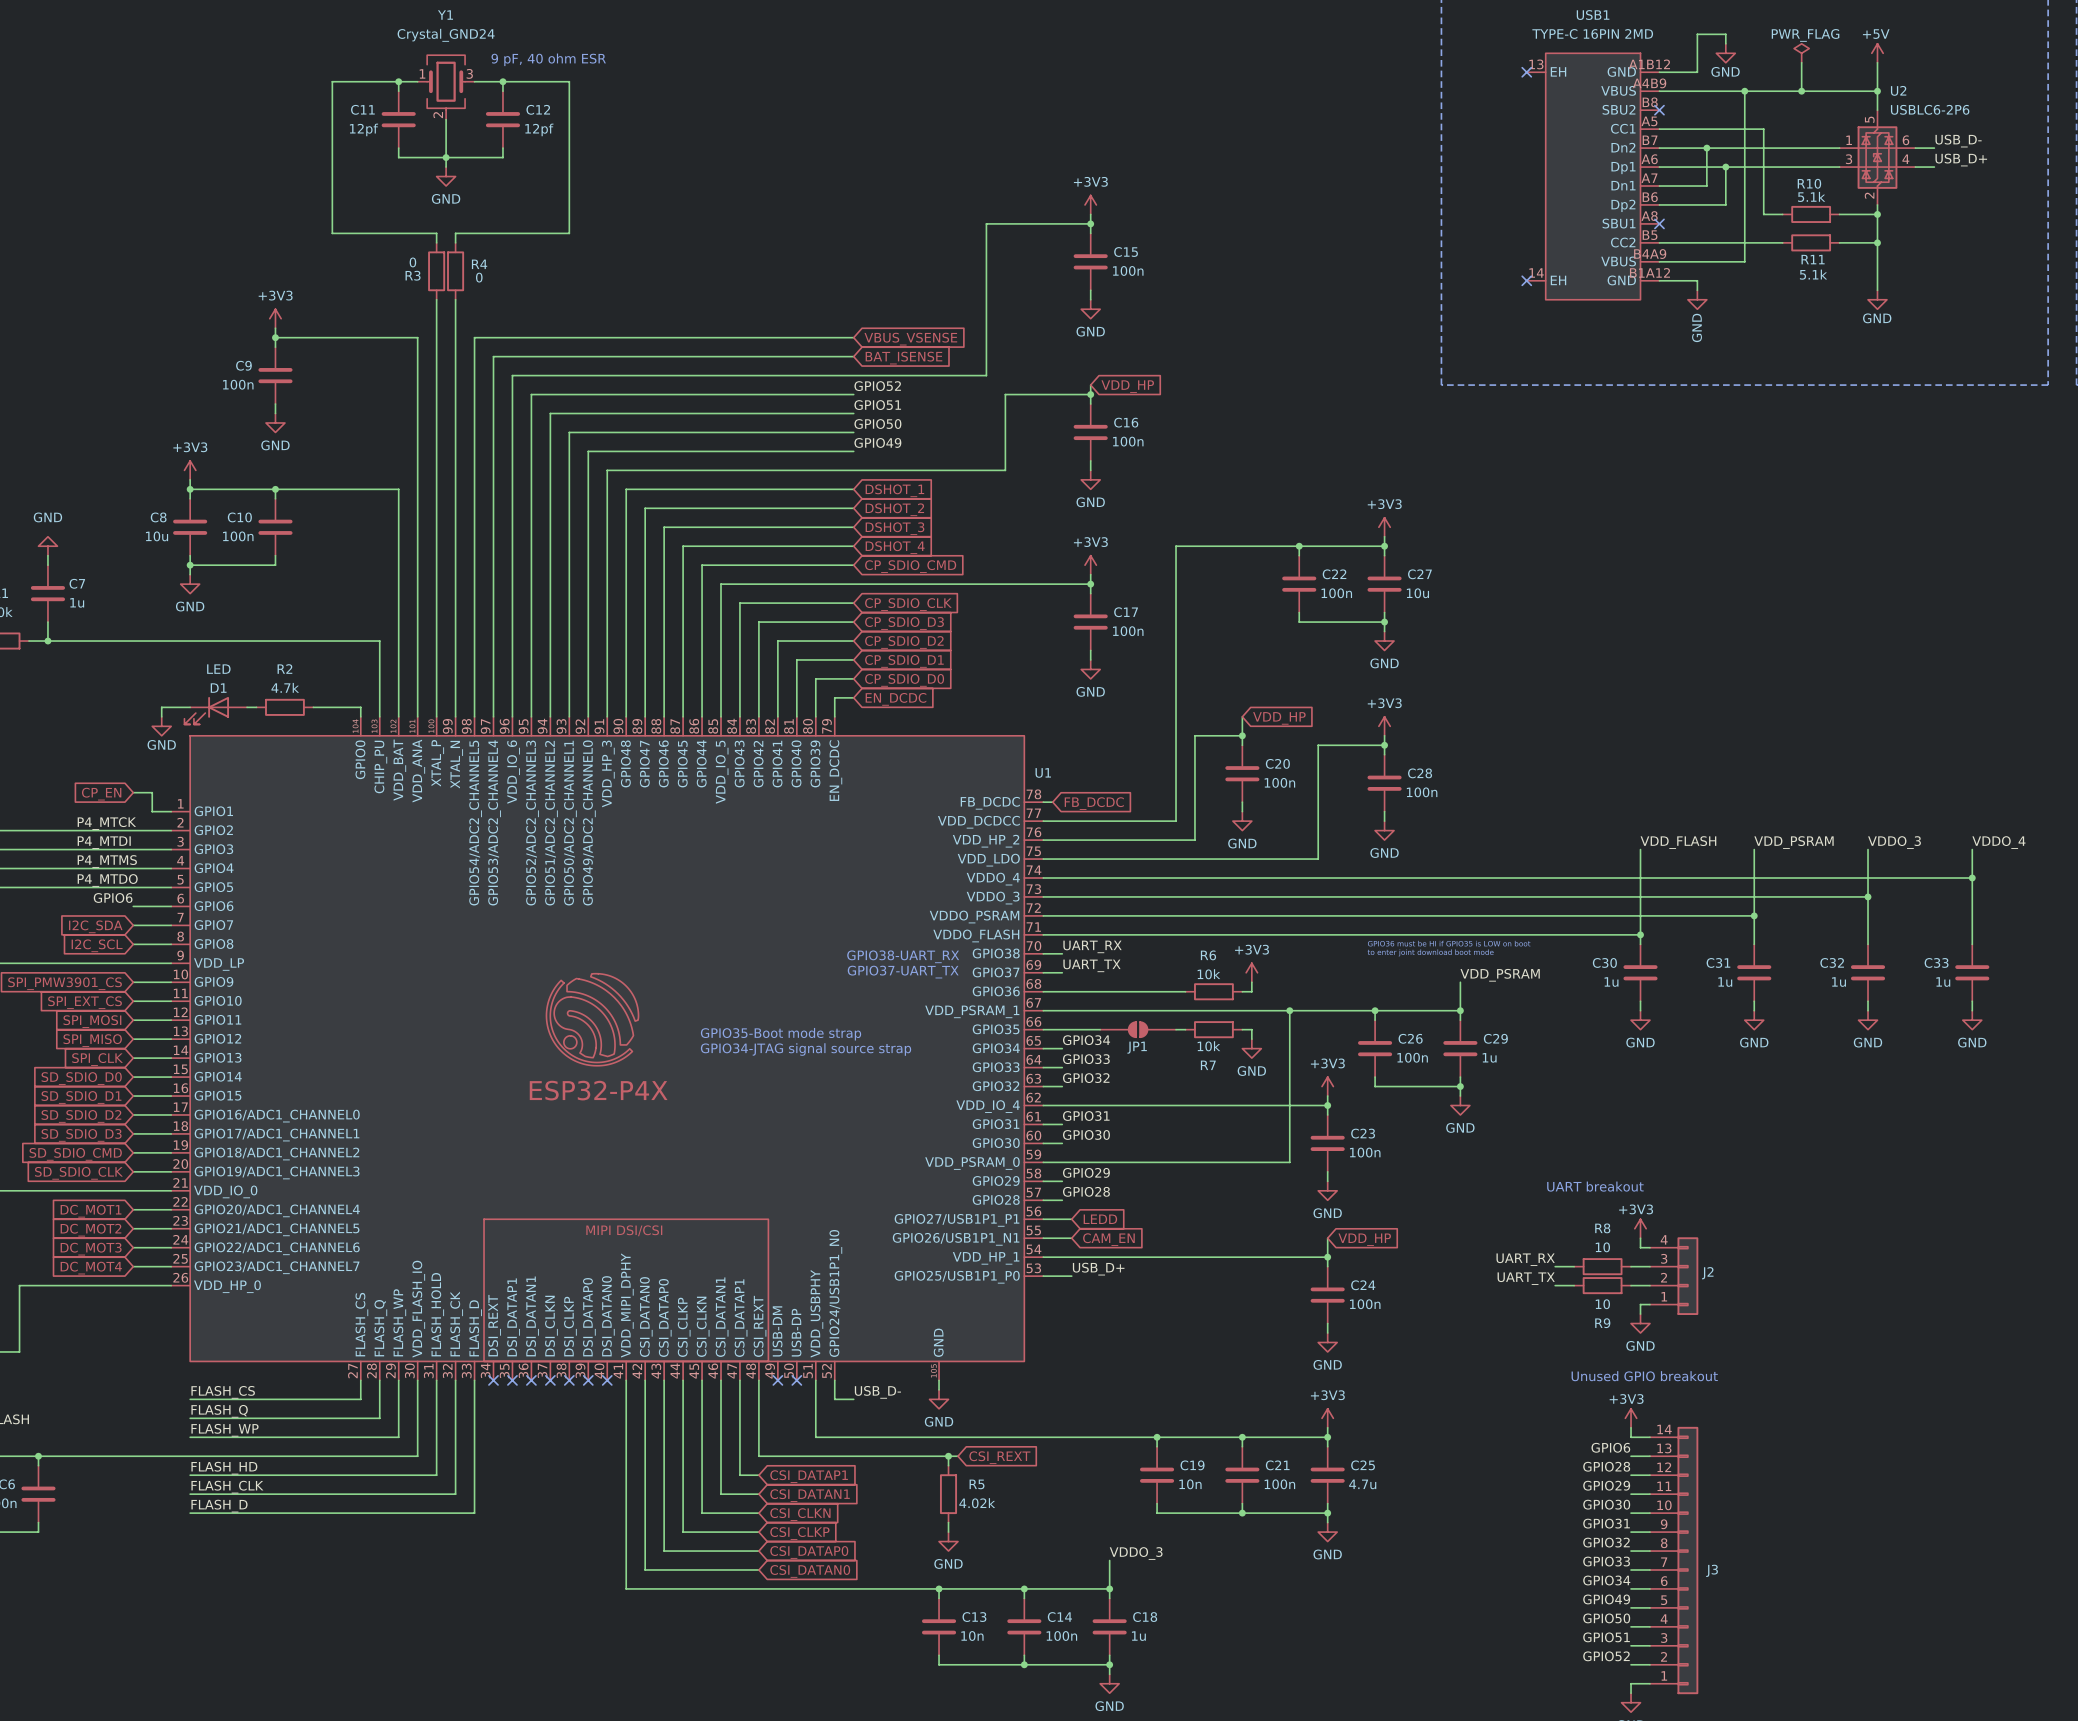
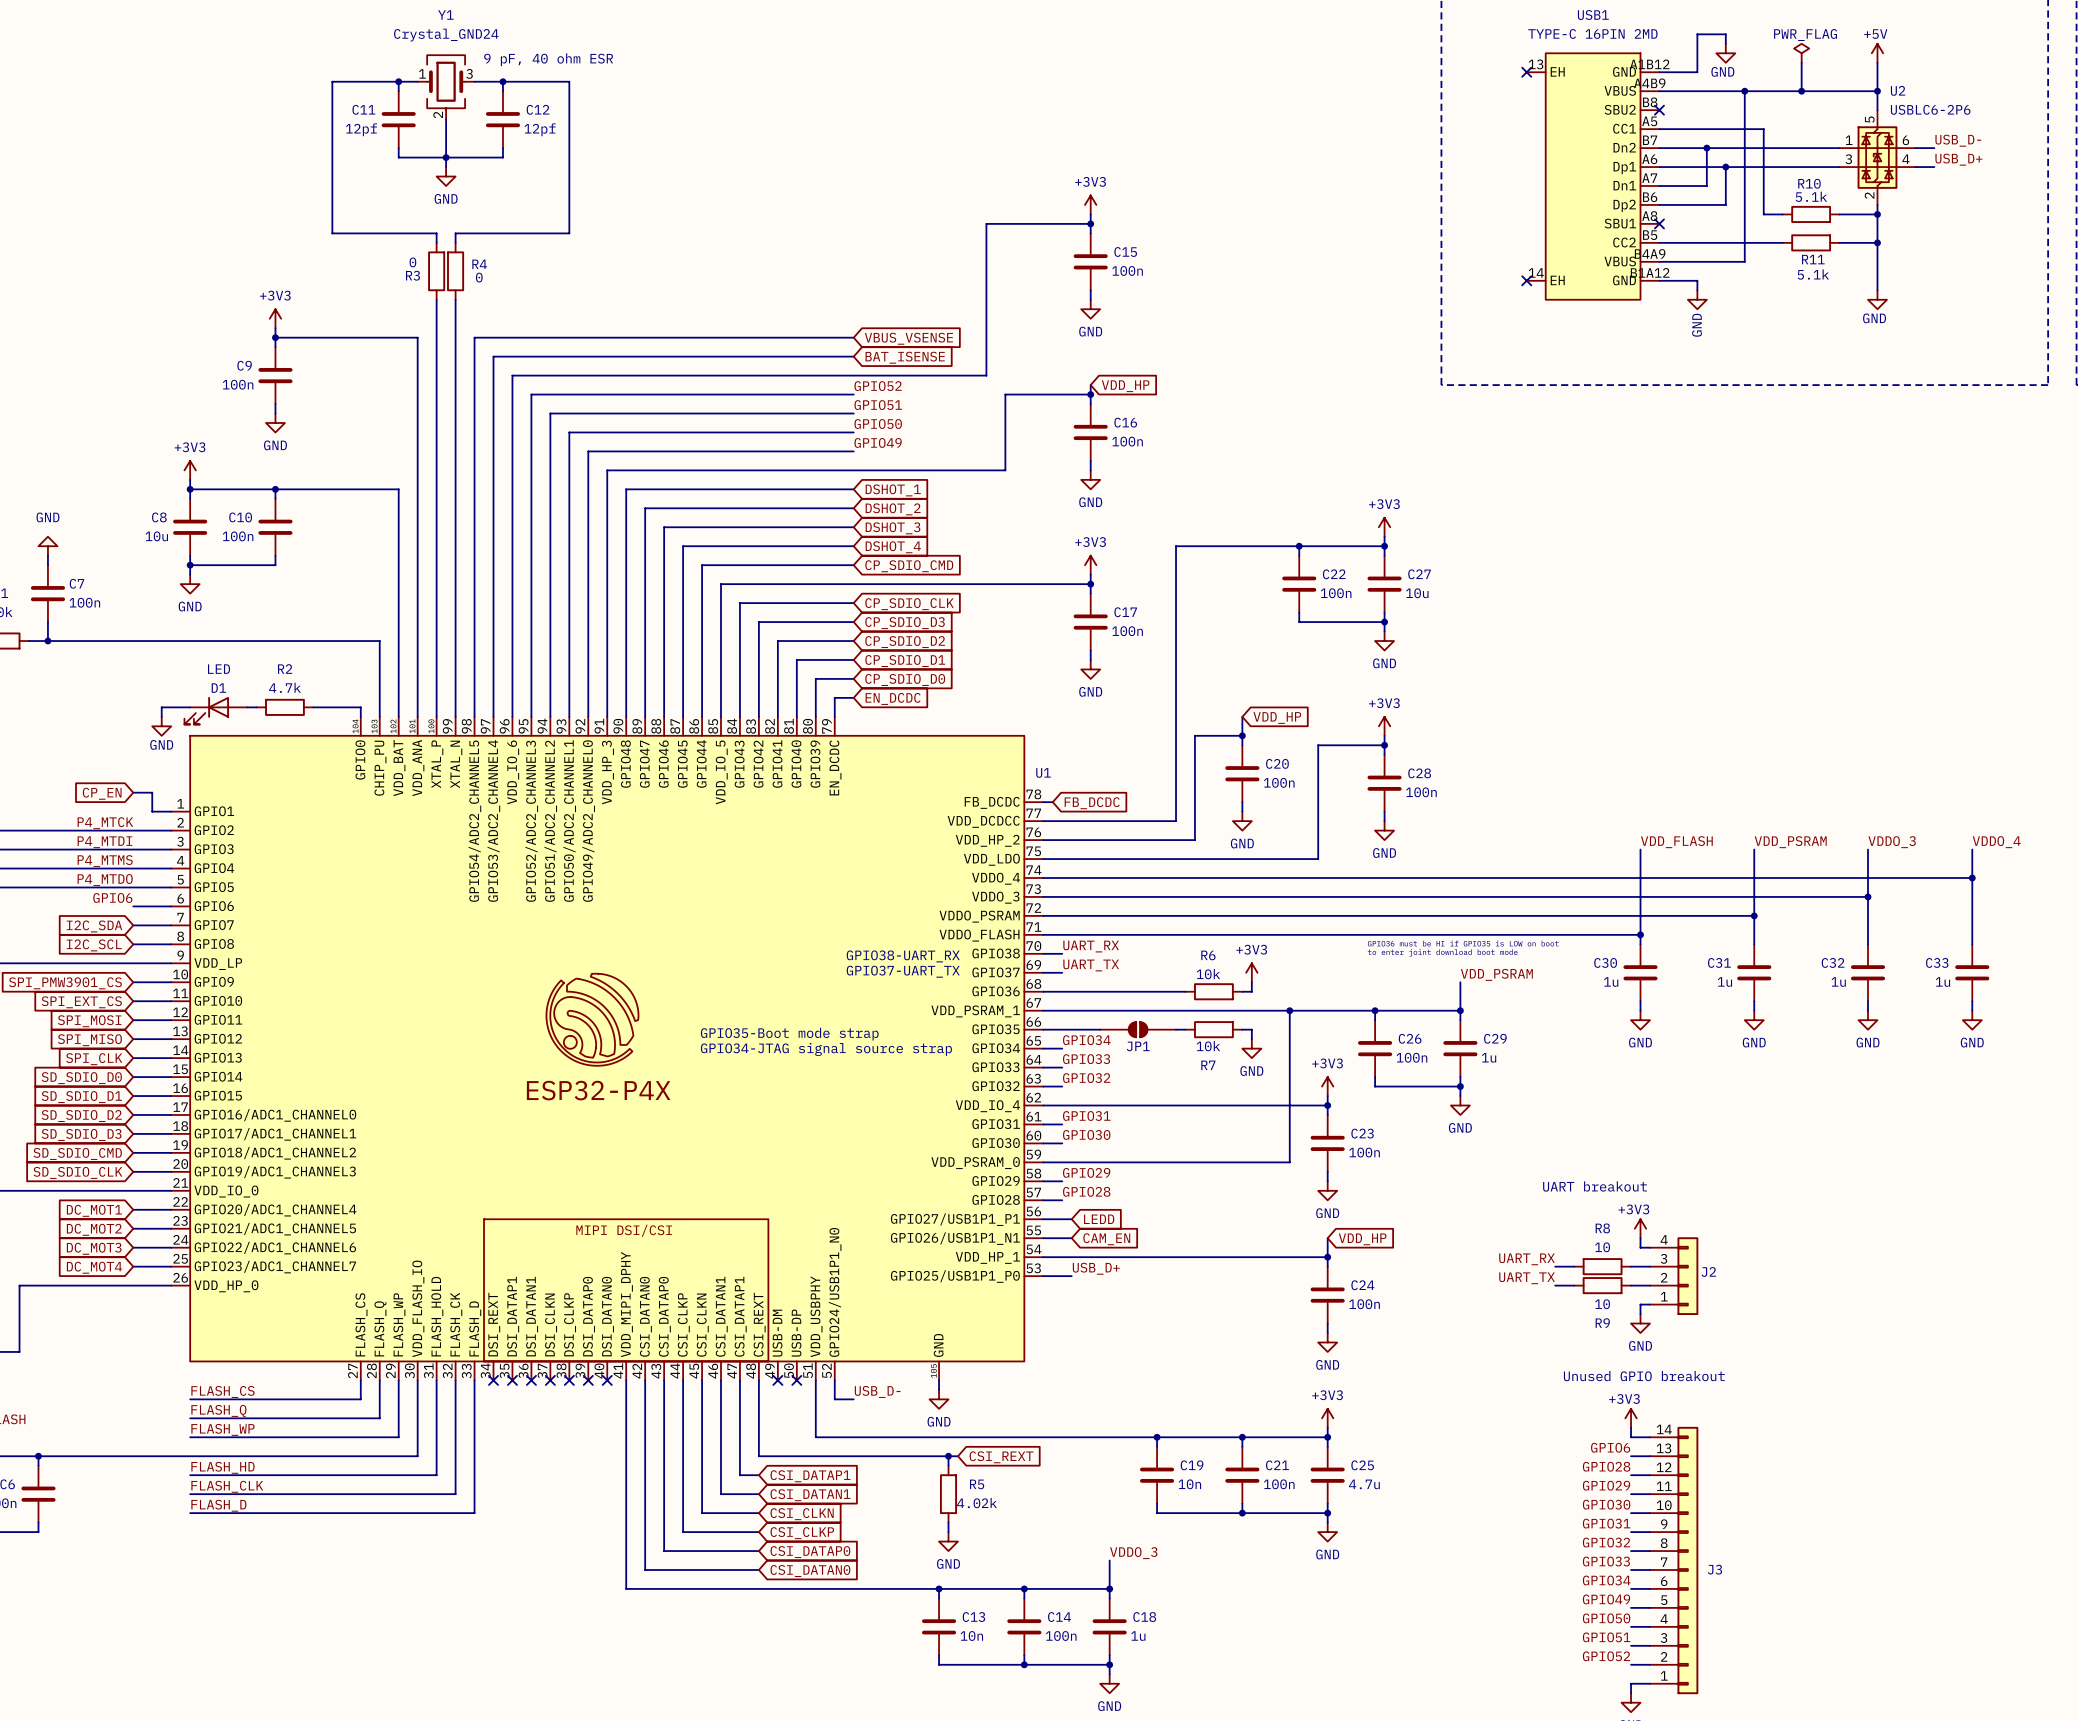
C7 value: 1u (77, 602) -> 100n (84, 602)

